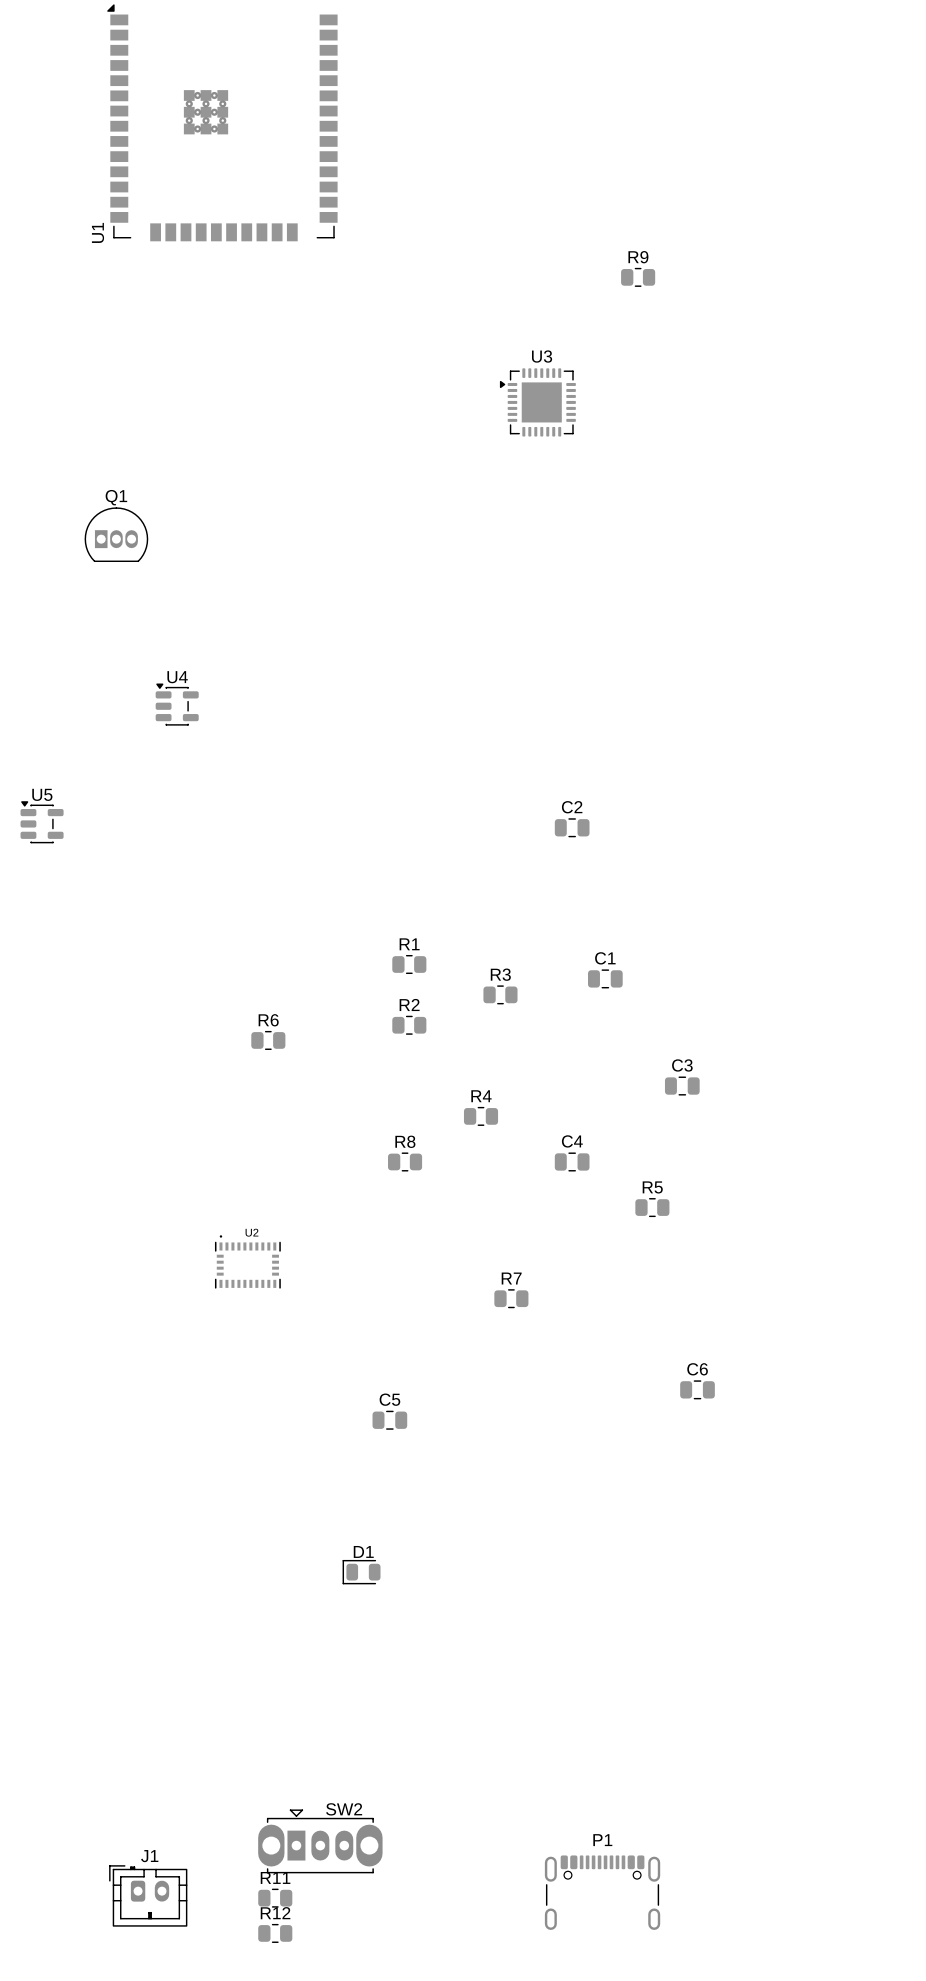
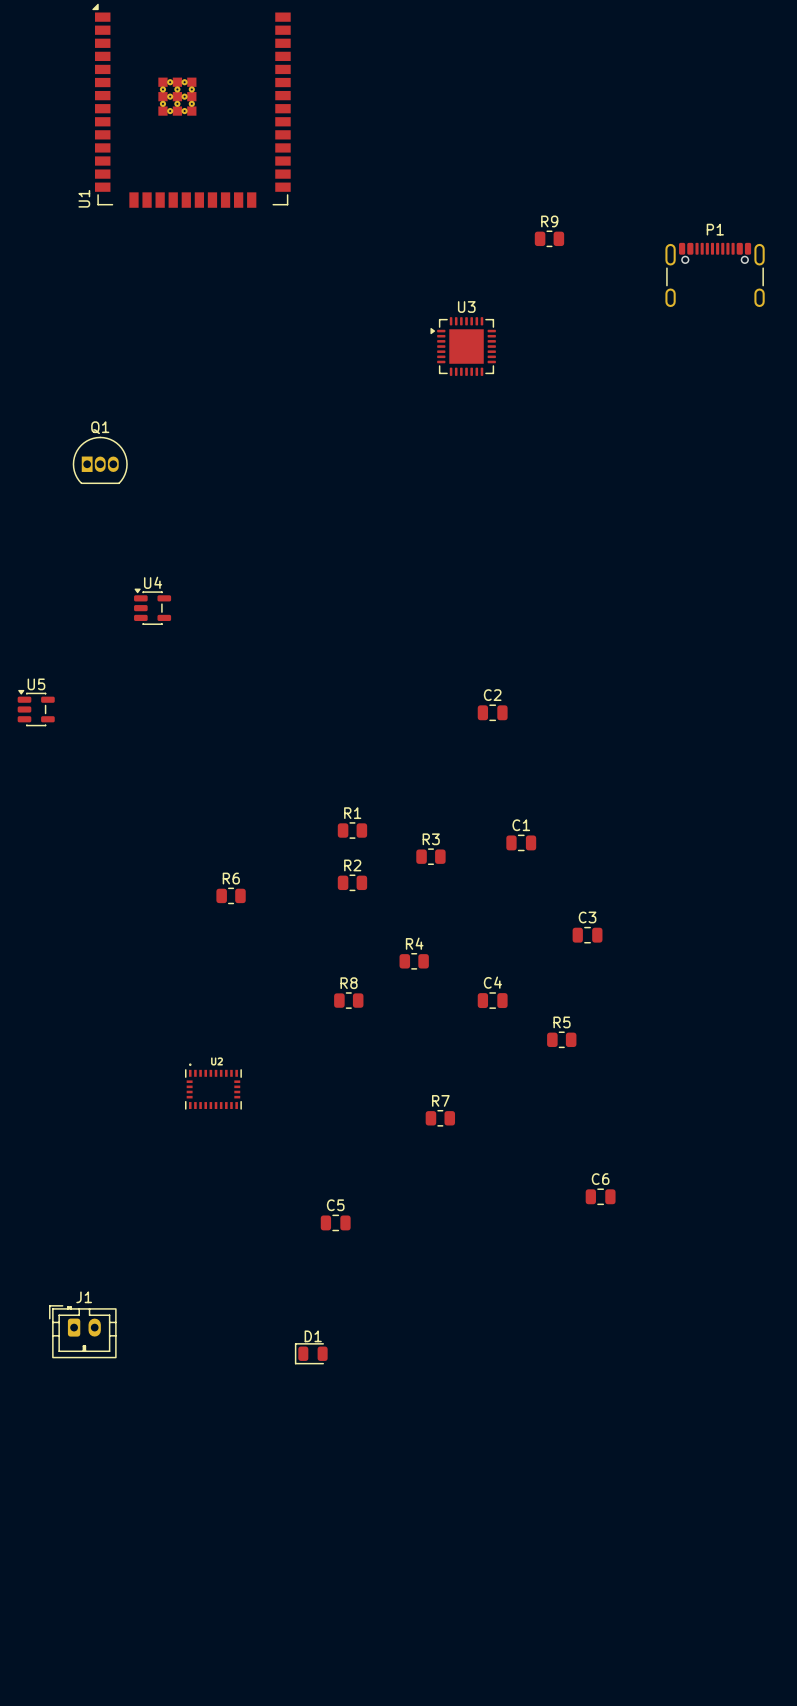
SW2: (320, 1841) -> none
P1 position: (602, 1892) -> (715, 274)
J1 position: (148, 1895) -> (82, 1331)
R11: (275, 1898) -> none
R12: (275, 1933) -> none

